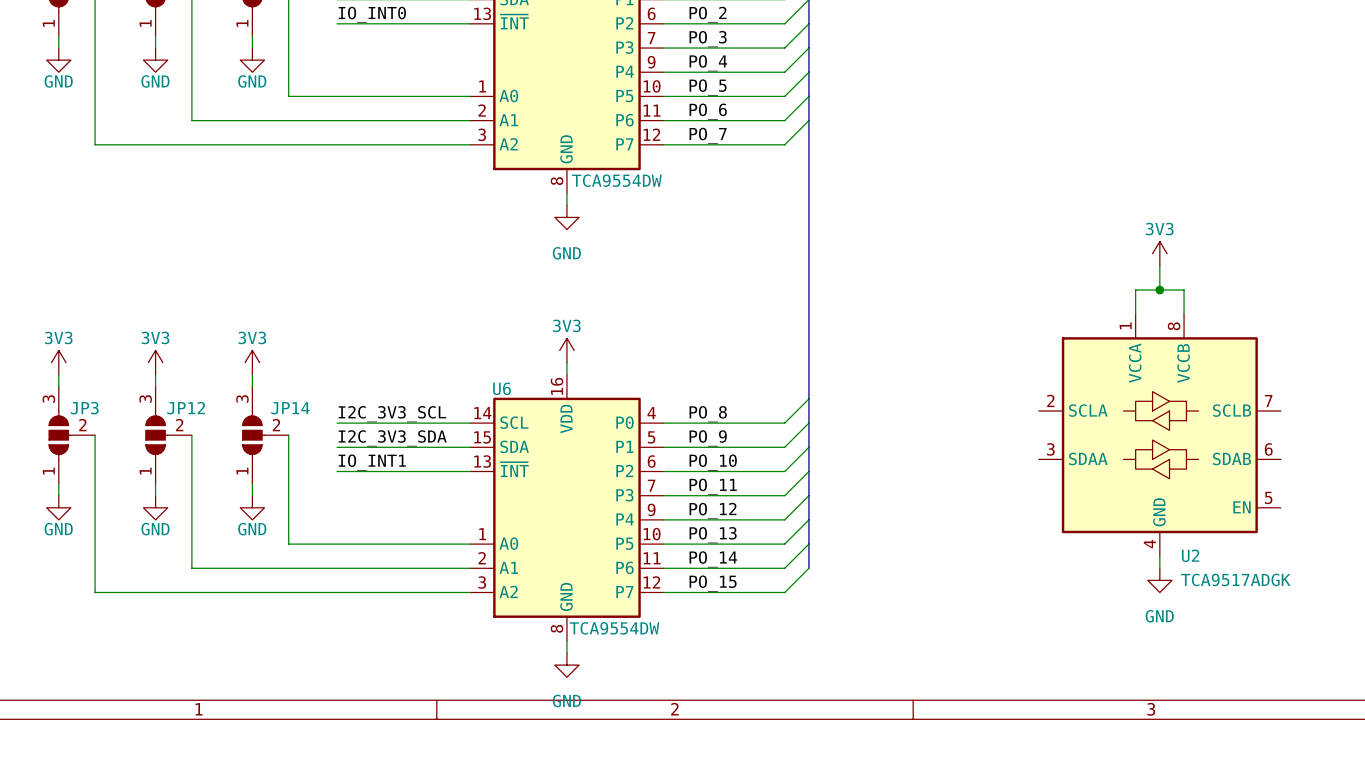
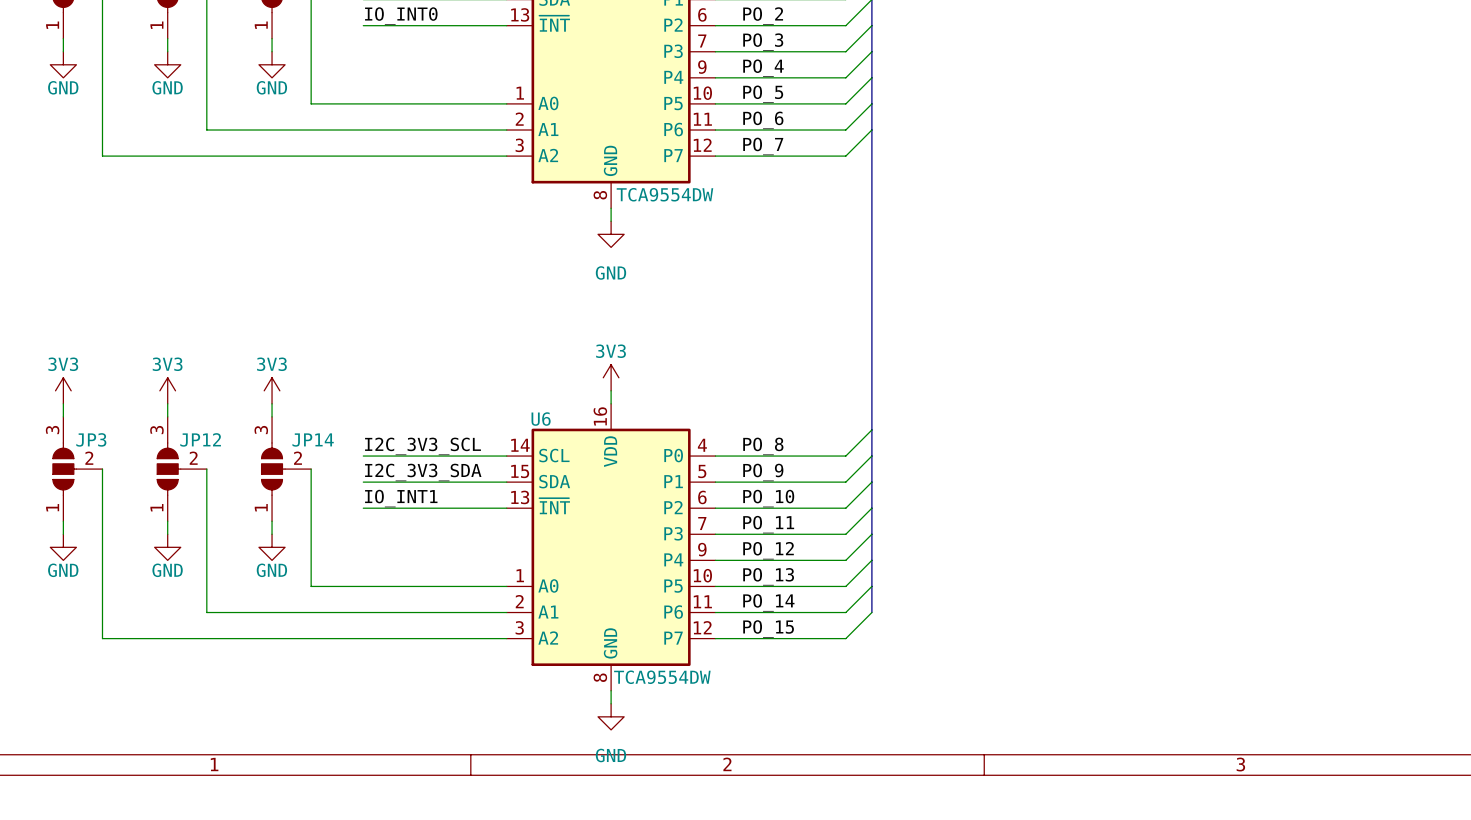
power symbol: 3V3 (1159, 253) -> none
wire: (1159, 265) (1159, 290) -> none
junction: (1159, 290) -> none
wire: (1135, 314) (1135, 290) (1184, 290) (1184, 314) -> none
U2: TCA9517ADGK (1159, 435) -> none
wire: (1159, 556) (1159, 568) -> none
power symbol: GND (1159, 580) -> none

